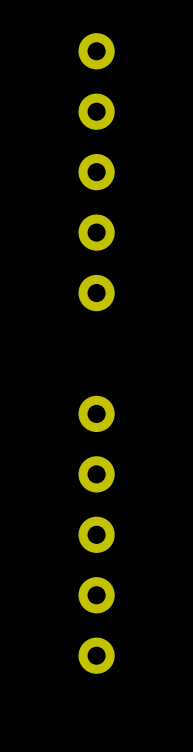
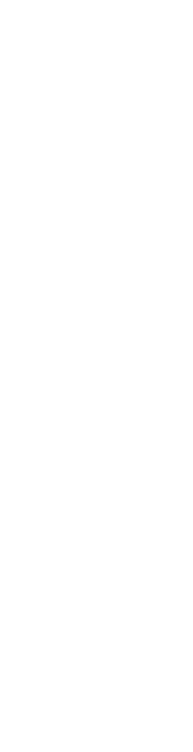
part: (96, 172) -> none
part: (96, 534) -> none

